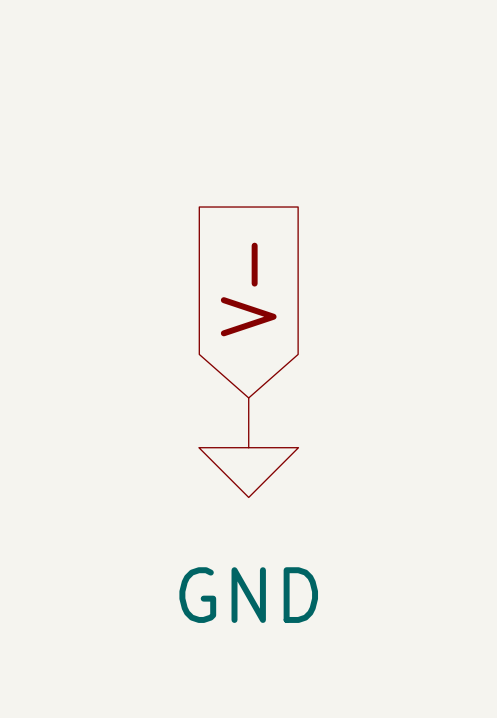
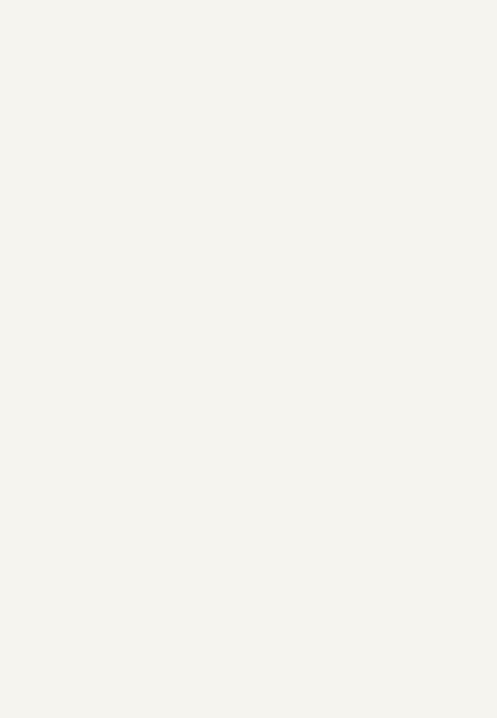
global label: V- (248, 289) -> none
power symbol: GND (248, 447) -> none

